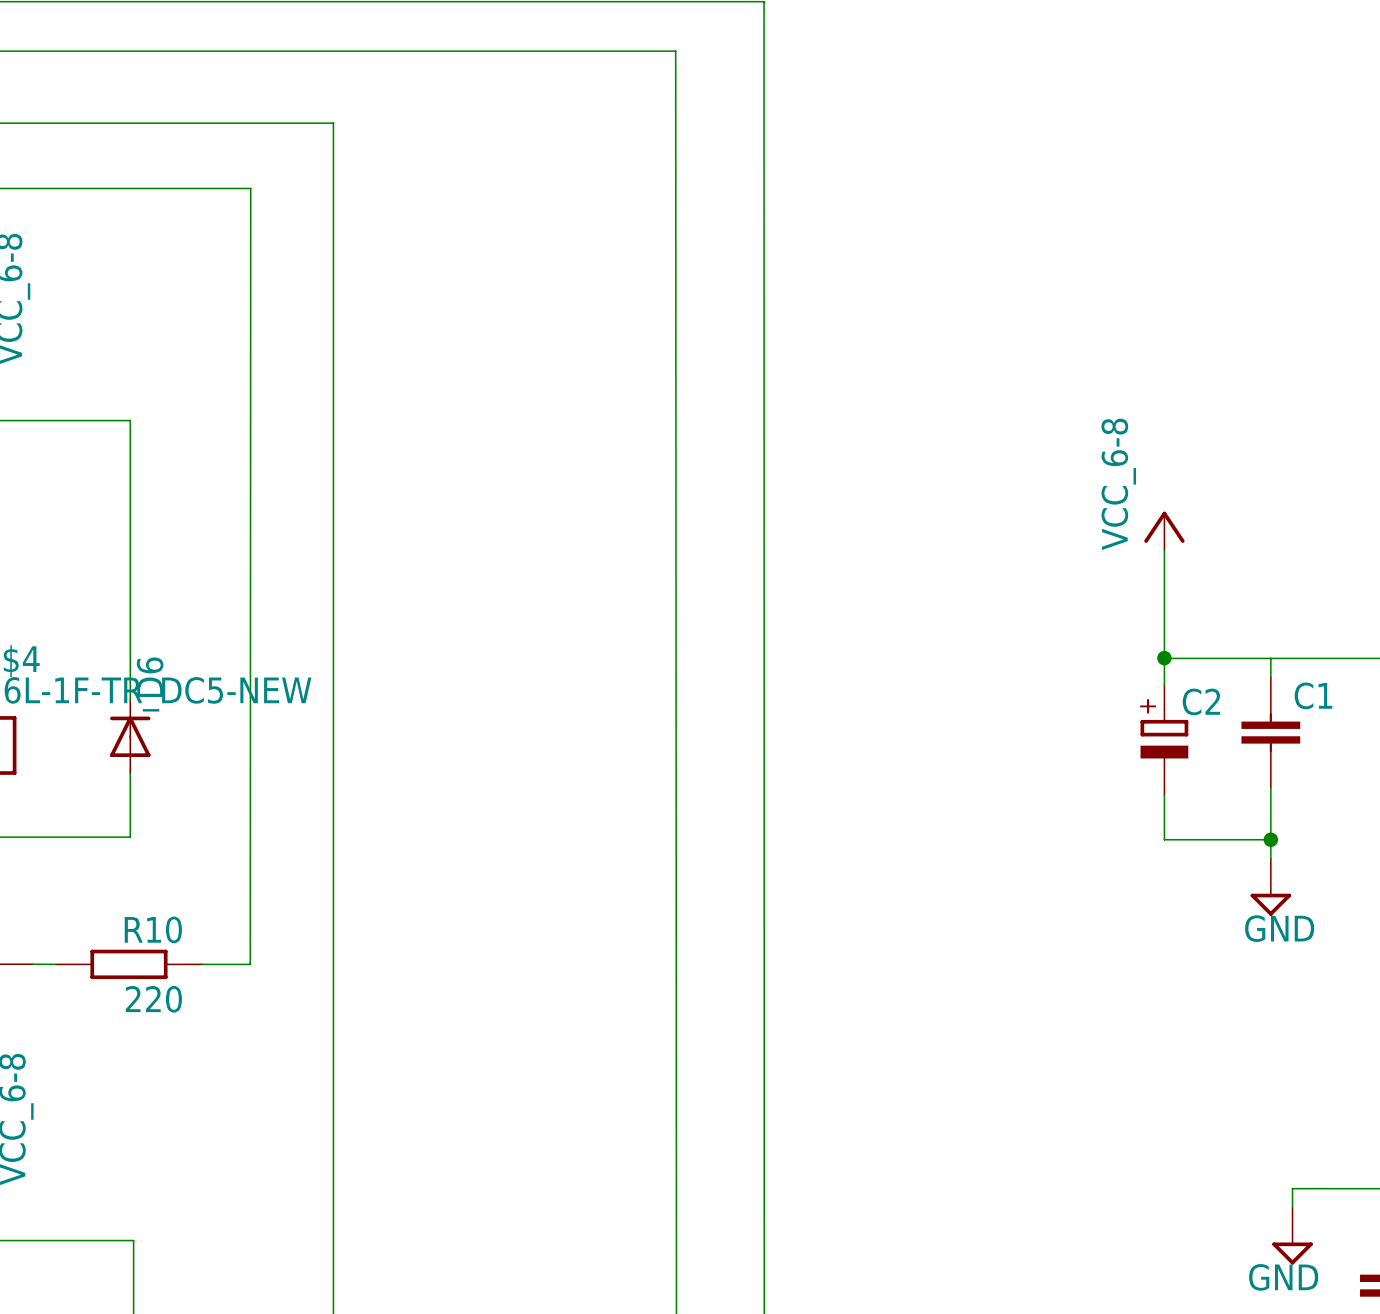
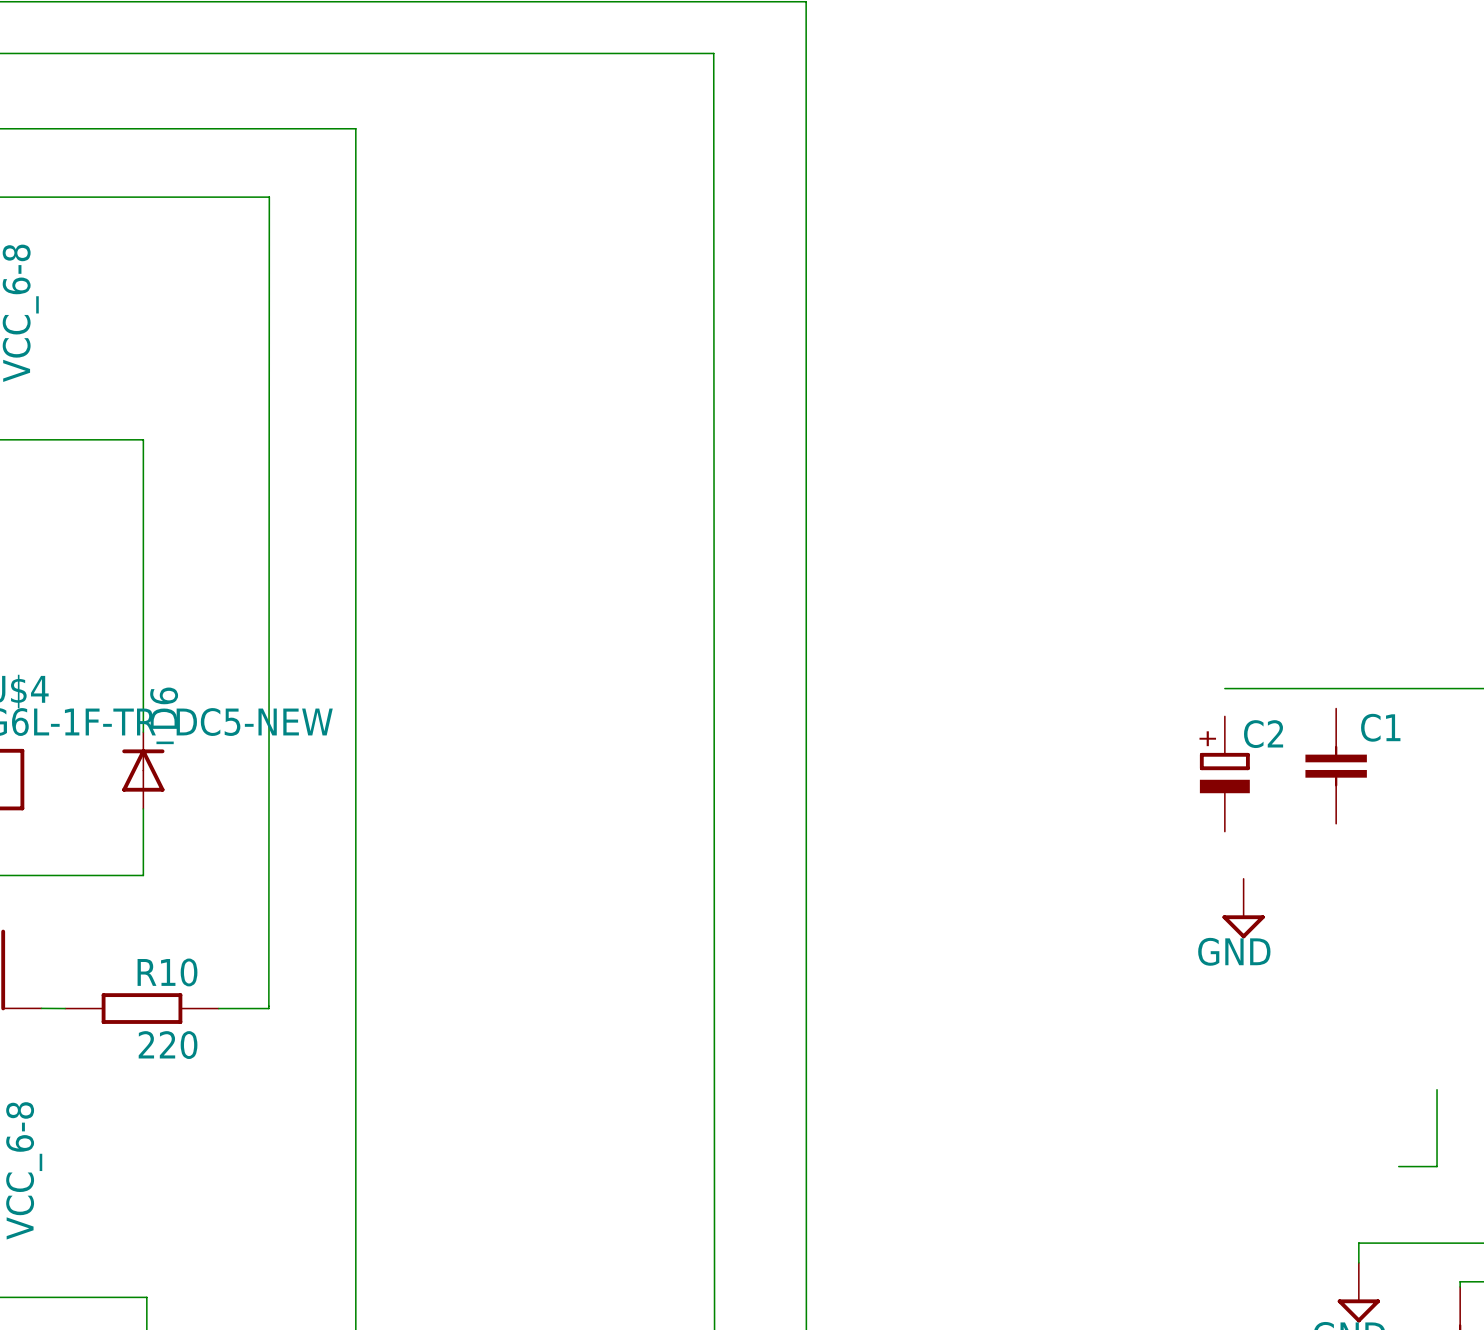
power symbol: VCC_6-8 (1164, 530) -> none
wire: (1164, 550) (1164, 685) -> none
junction: (1164, 658) -> none
wire: (1270, 658) (1270, 677) -> none
wire: (1270, 787) (1270, 858) -> none
wire: (1164, 795) (1164, 839) (1270, 839) -> none
junction: (1270, 839) -> none
power symbol position: GND (1270, 887) -> GND (1243, 908)
power symbol text position: GND (1279, 928) -> GND (1234, 951)
wire: none -> (1437, 1089) (1437, 1166) (1398, 1166)

